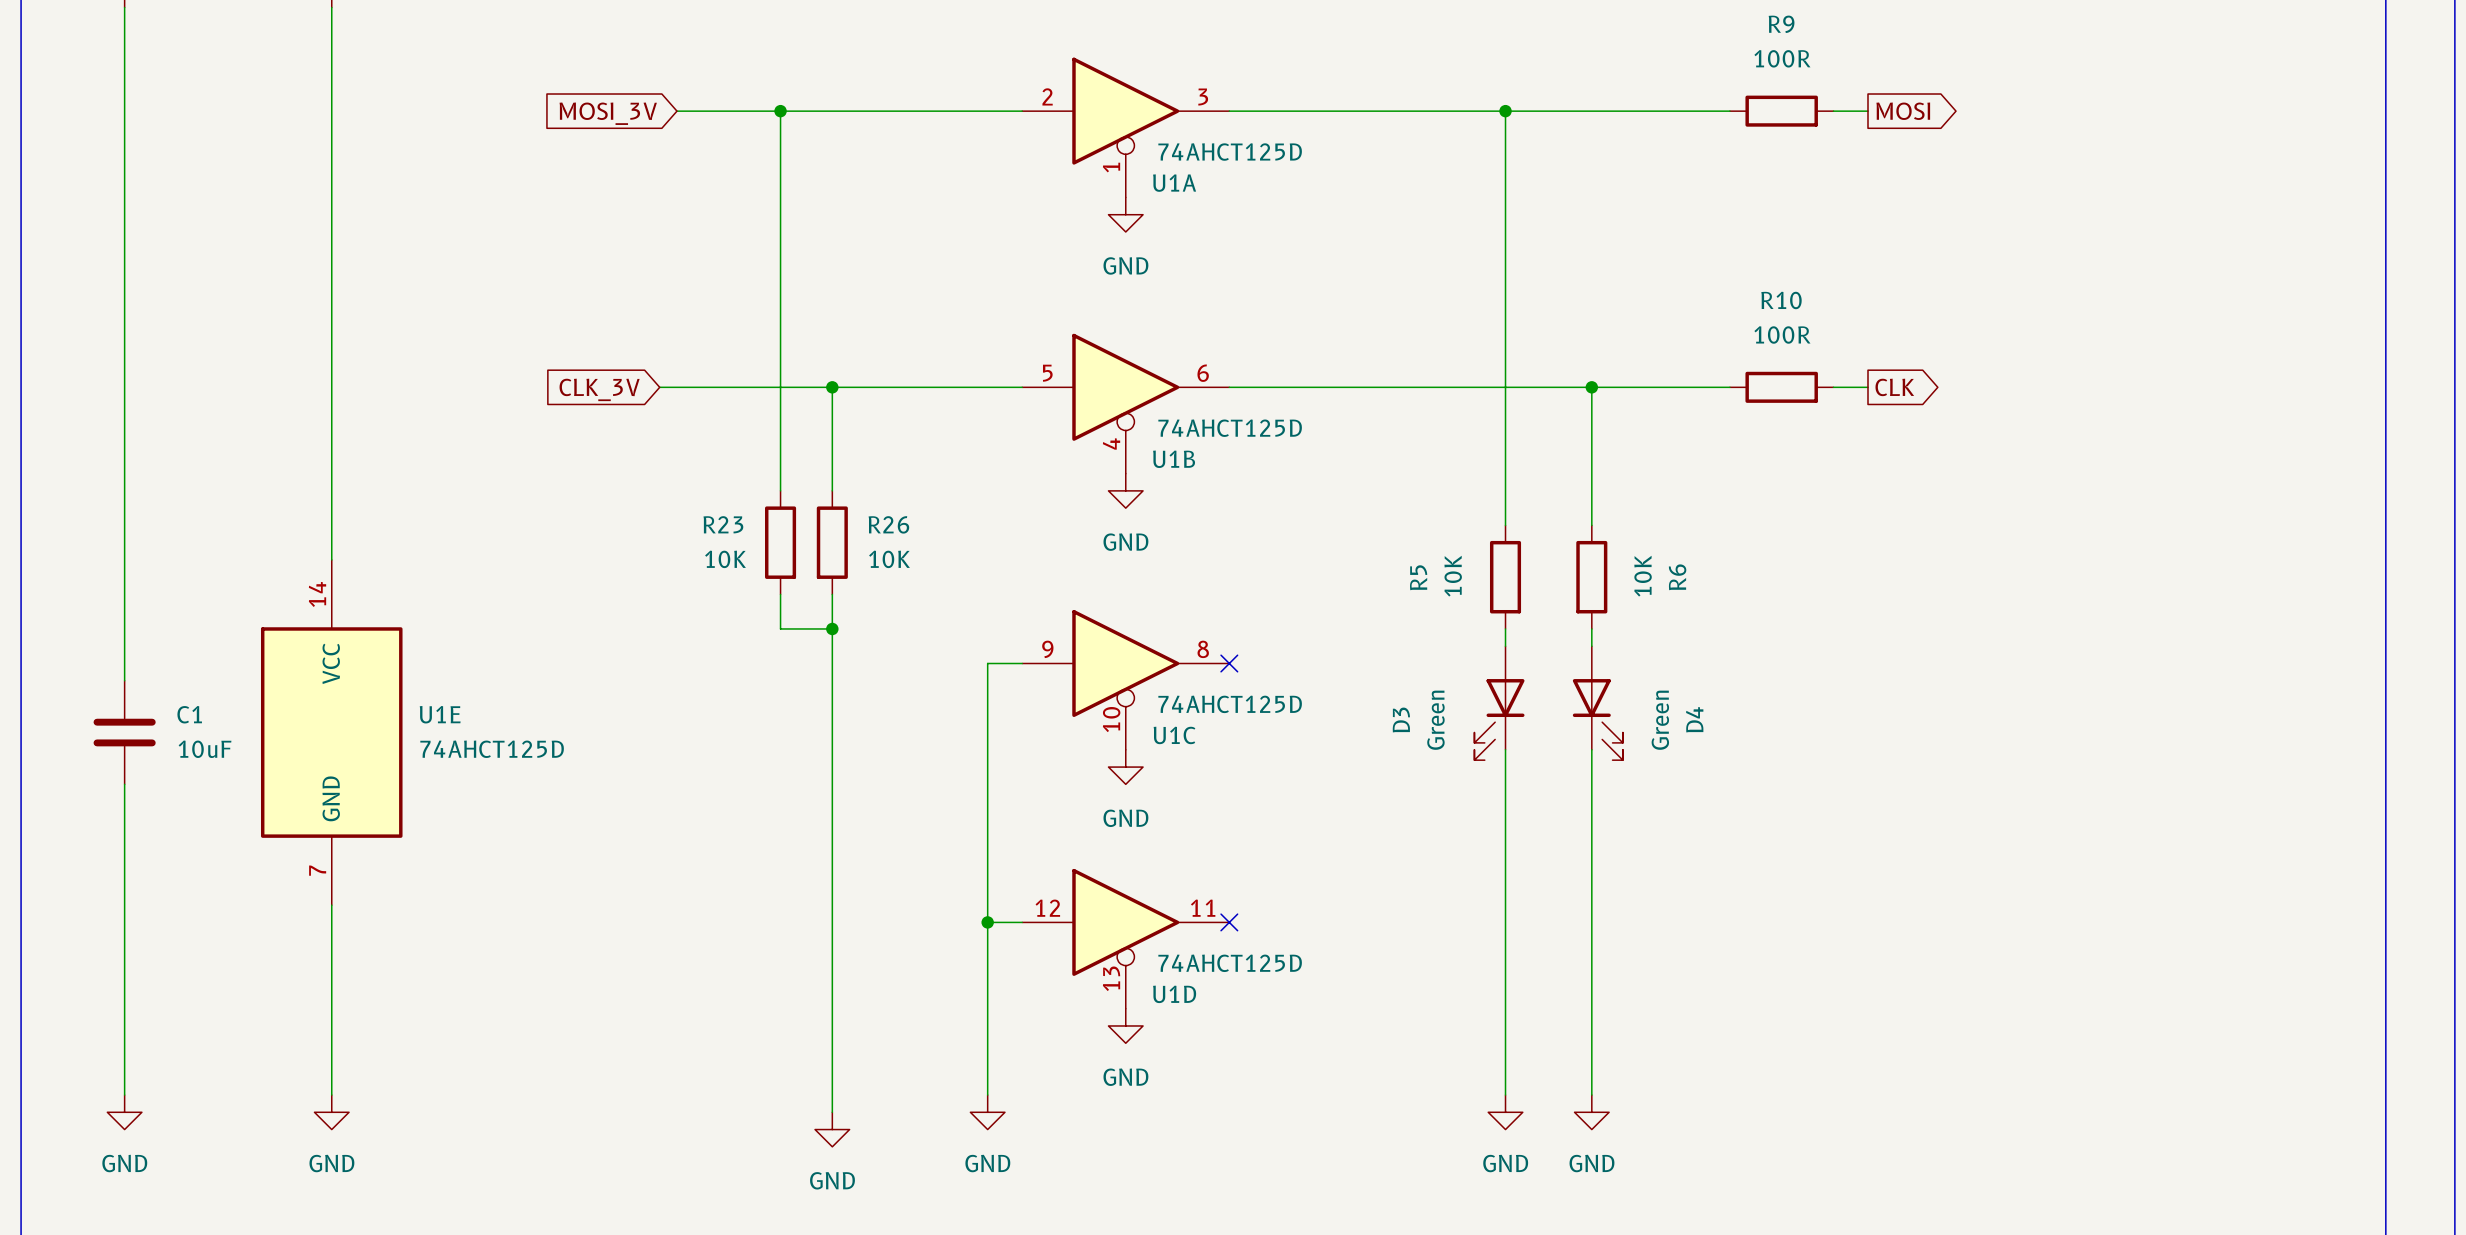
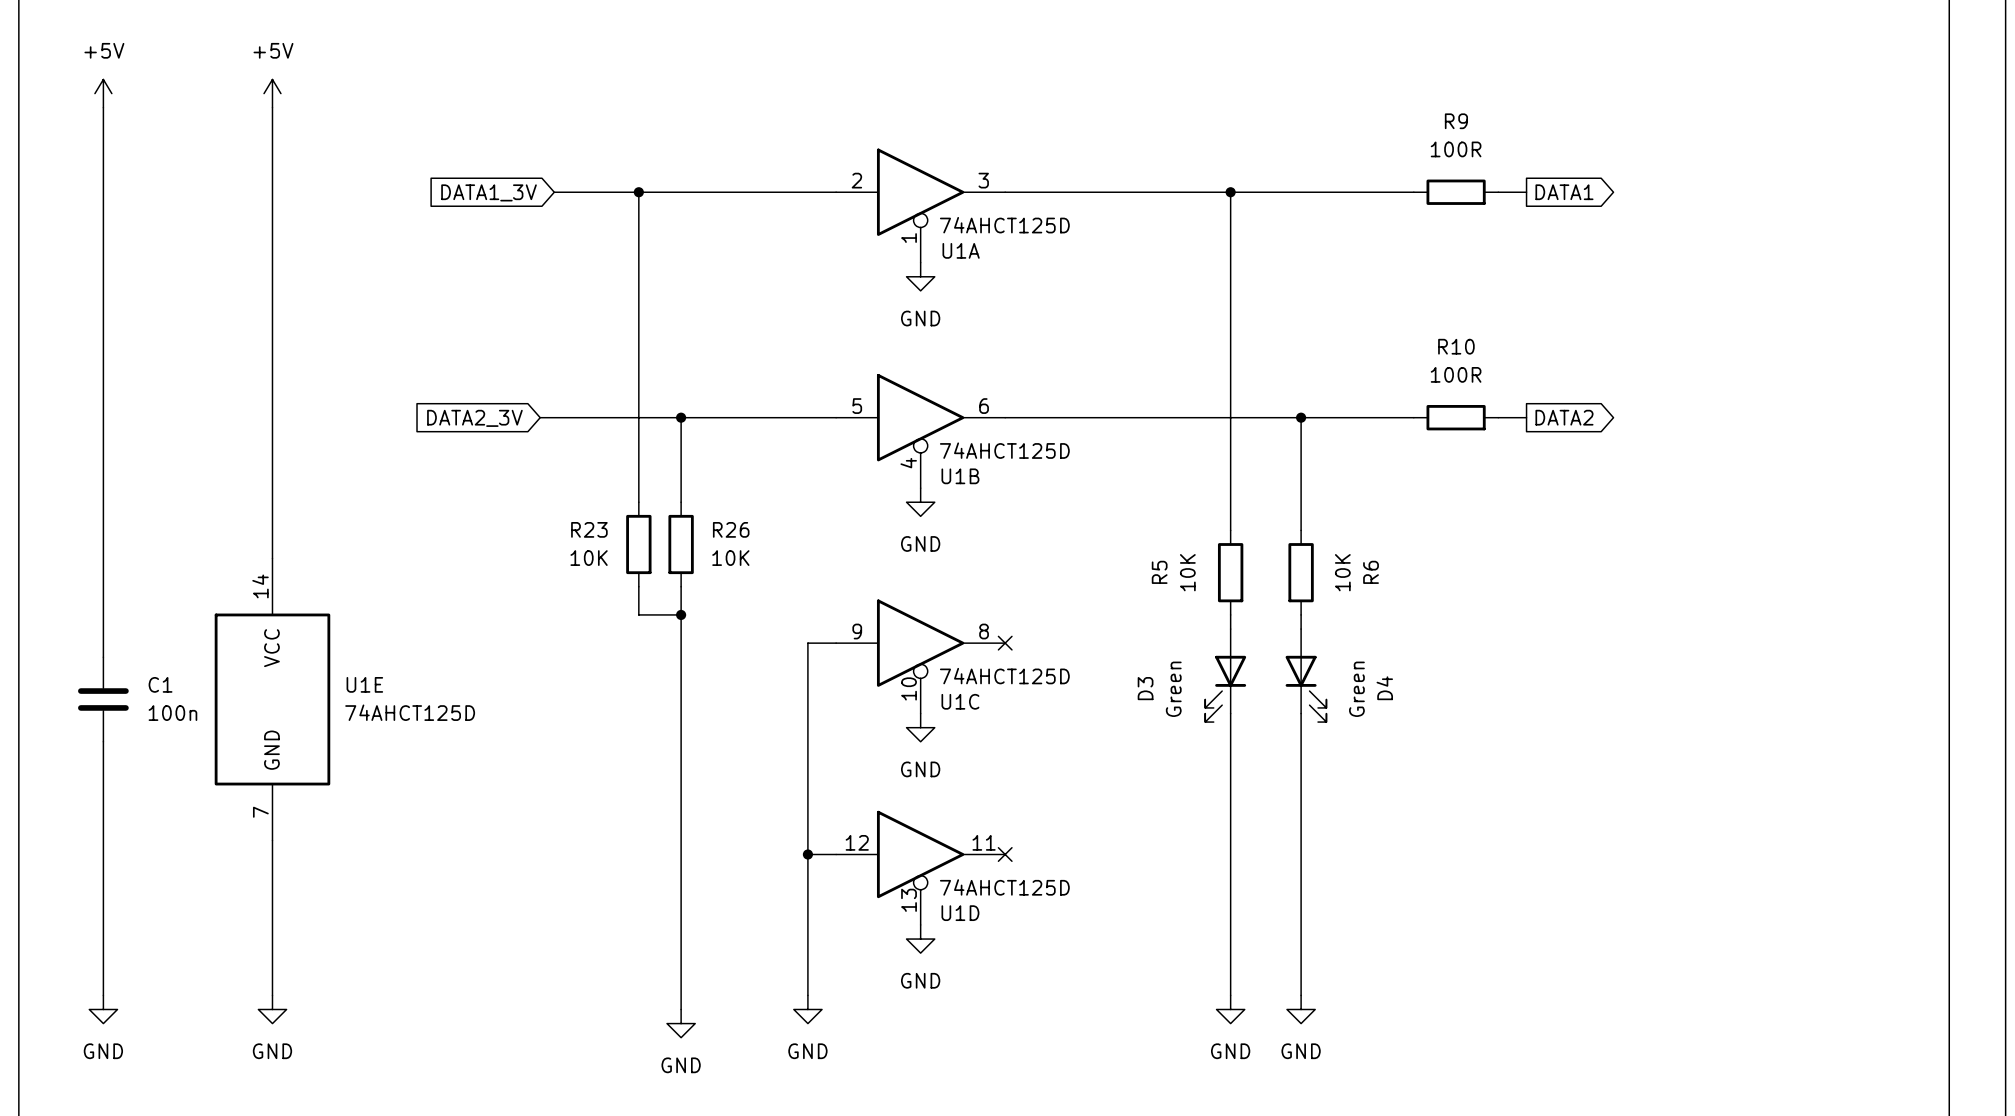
global label: MOSI (1903, 111) -> DATA1 (1564, 192)
global label: MOSI_3V (608, 113) -> DATA1_3V (489, 192)
global label: CLK (1894, 387) -> DATA2 (1564, 417)
global label: CLK_3V (599, 389) -> DATA2_3V (474, 418)
C1 value: 10uF (205, 749) -> 100n (172, 713)

